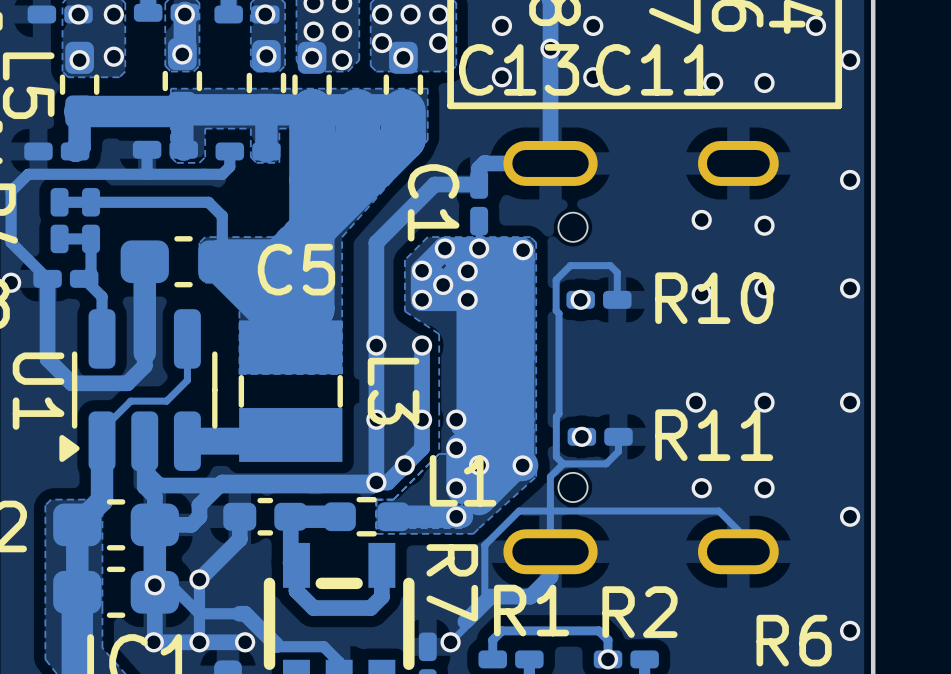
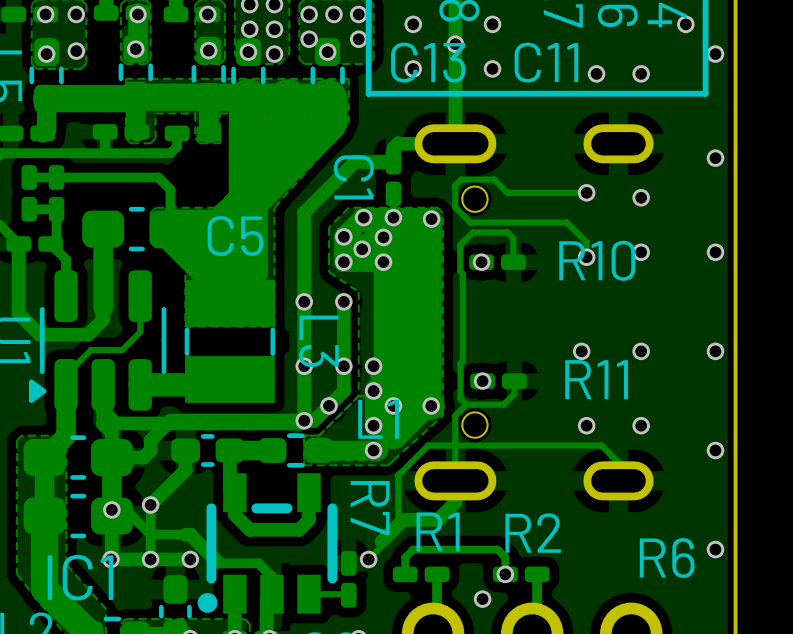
track: none -> (586, 192) (507, 192) (494, 179) (461, 179) (455, 185) (455, 207) (470, 222) (566, 222) (586, 242) (586, 257)

